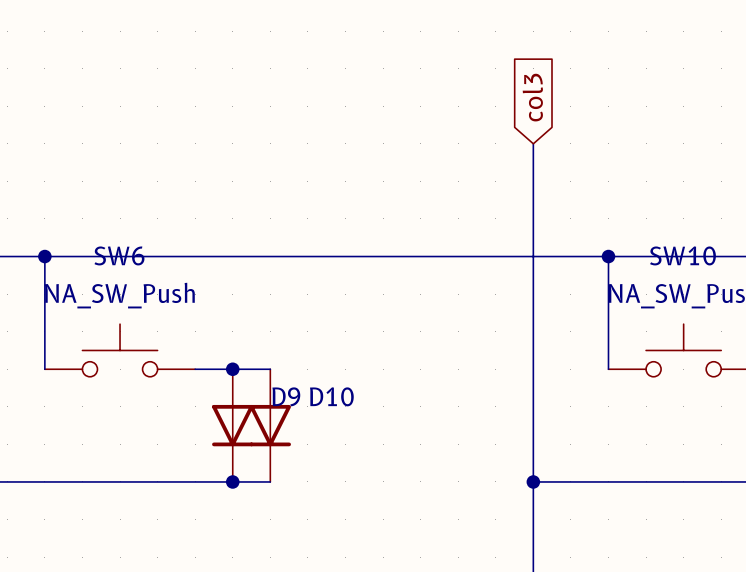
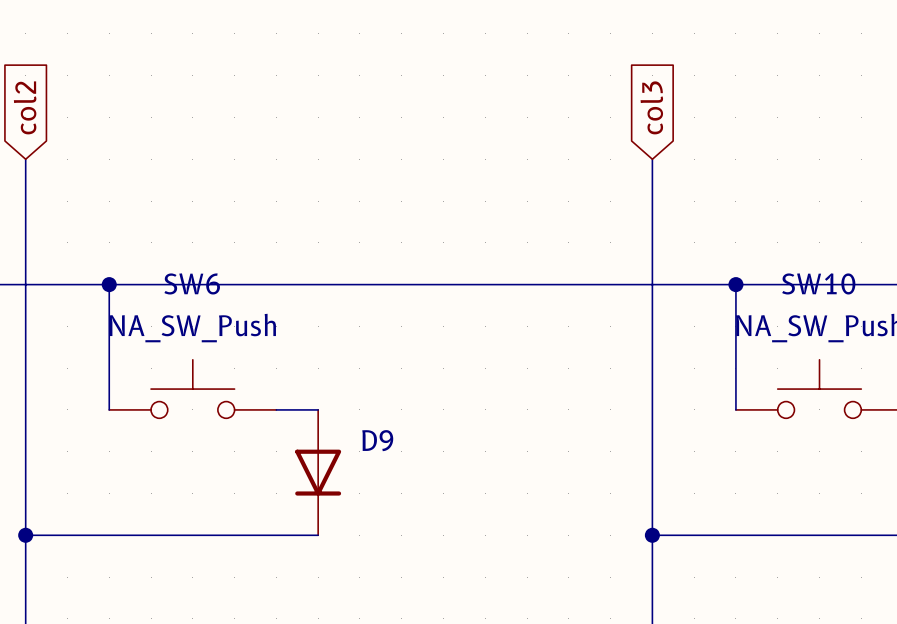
wire: (232, 369) (270, 369) -> none
junction: (232, 369) -> none
D10: (270, 425) -> none
wire: (232, 481) (270, 481) -> none
junction: (232, 481) -> none

